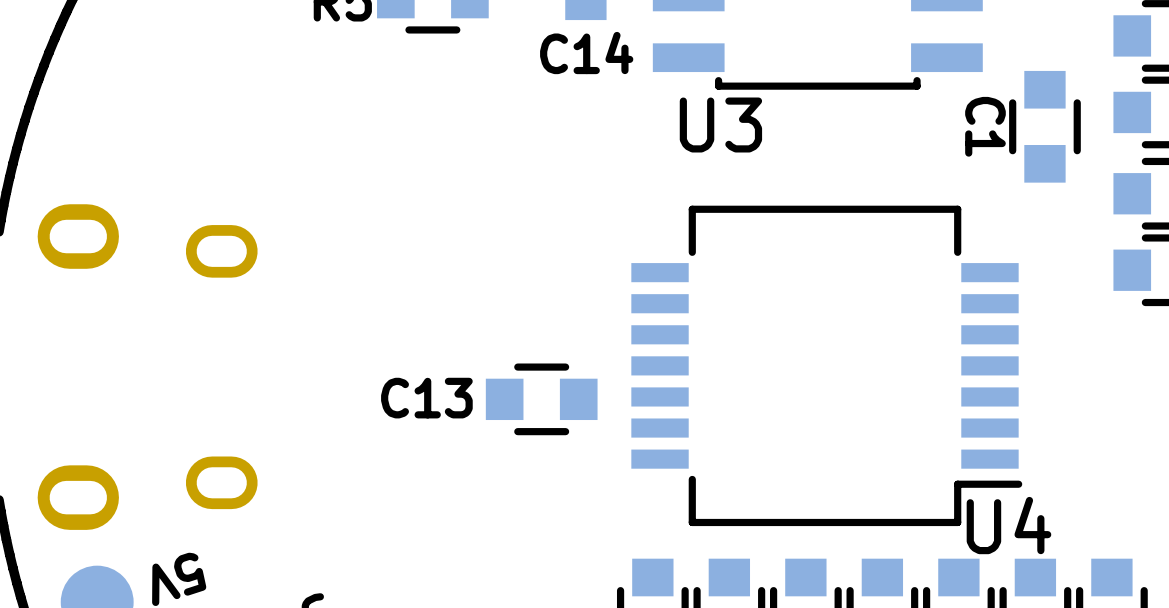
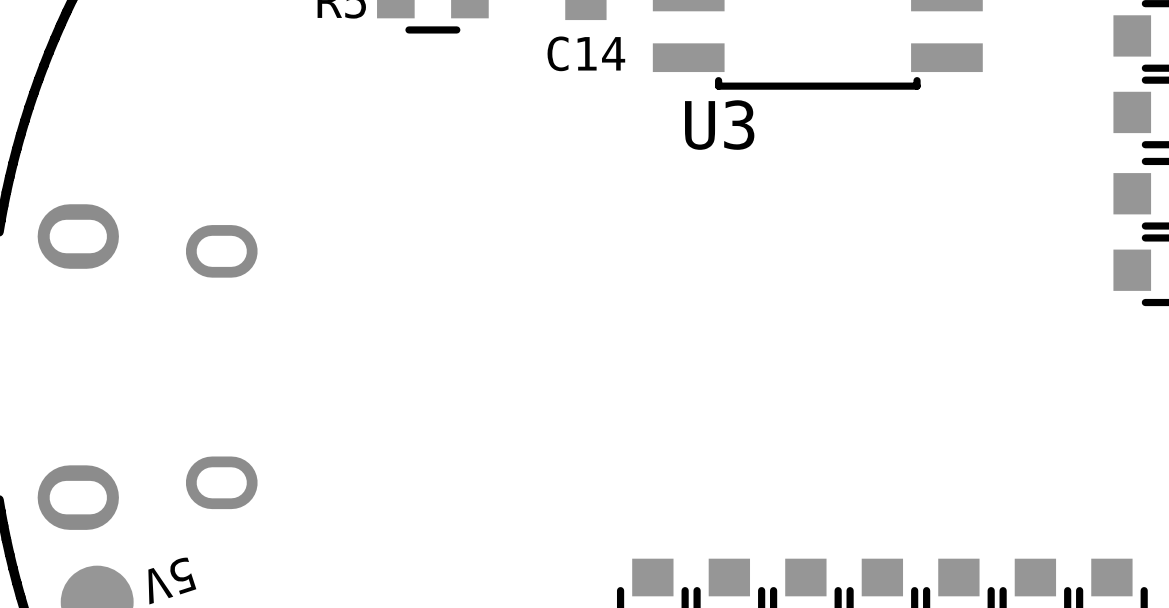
C1: (1044, 126) -> none
U4: (826, 365) -> none
C13: (541, 399) -> none

